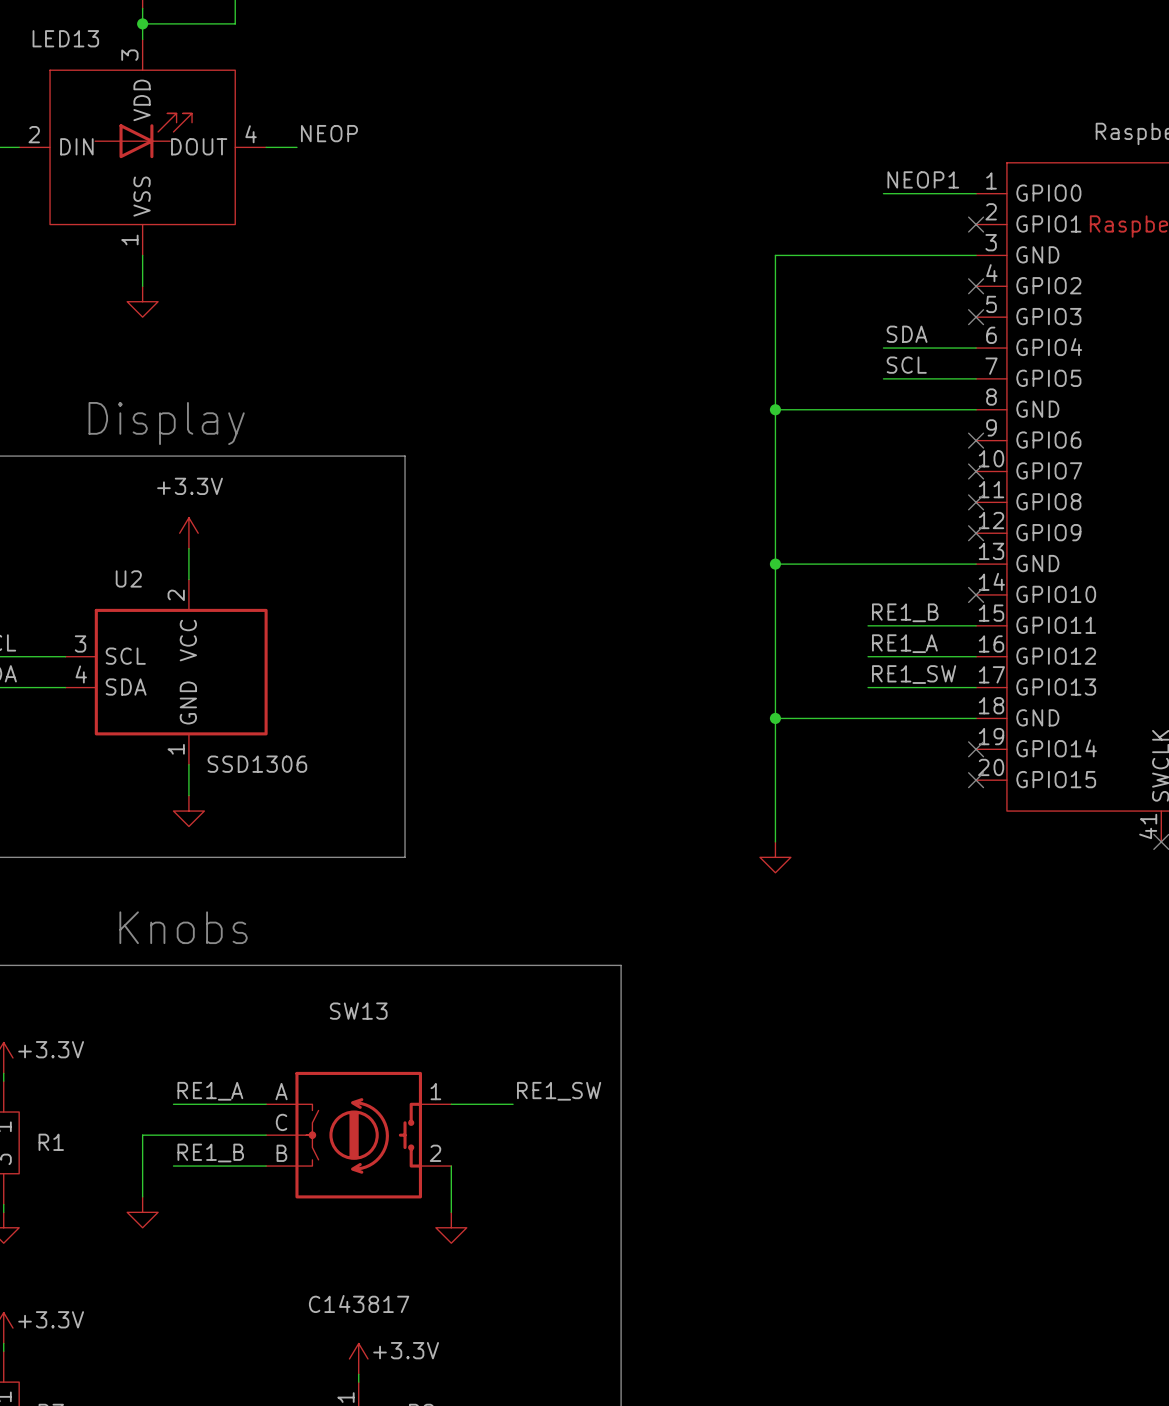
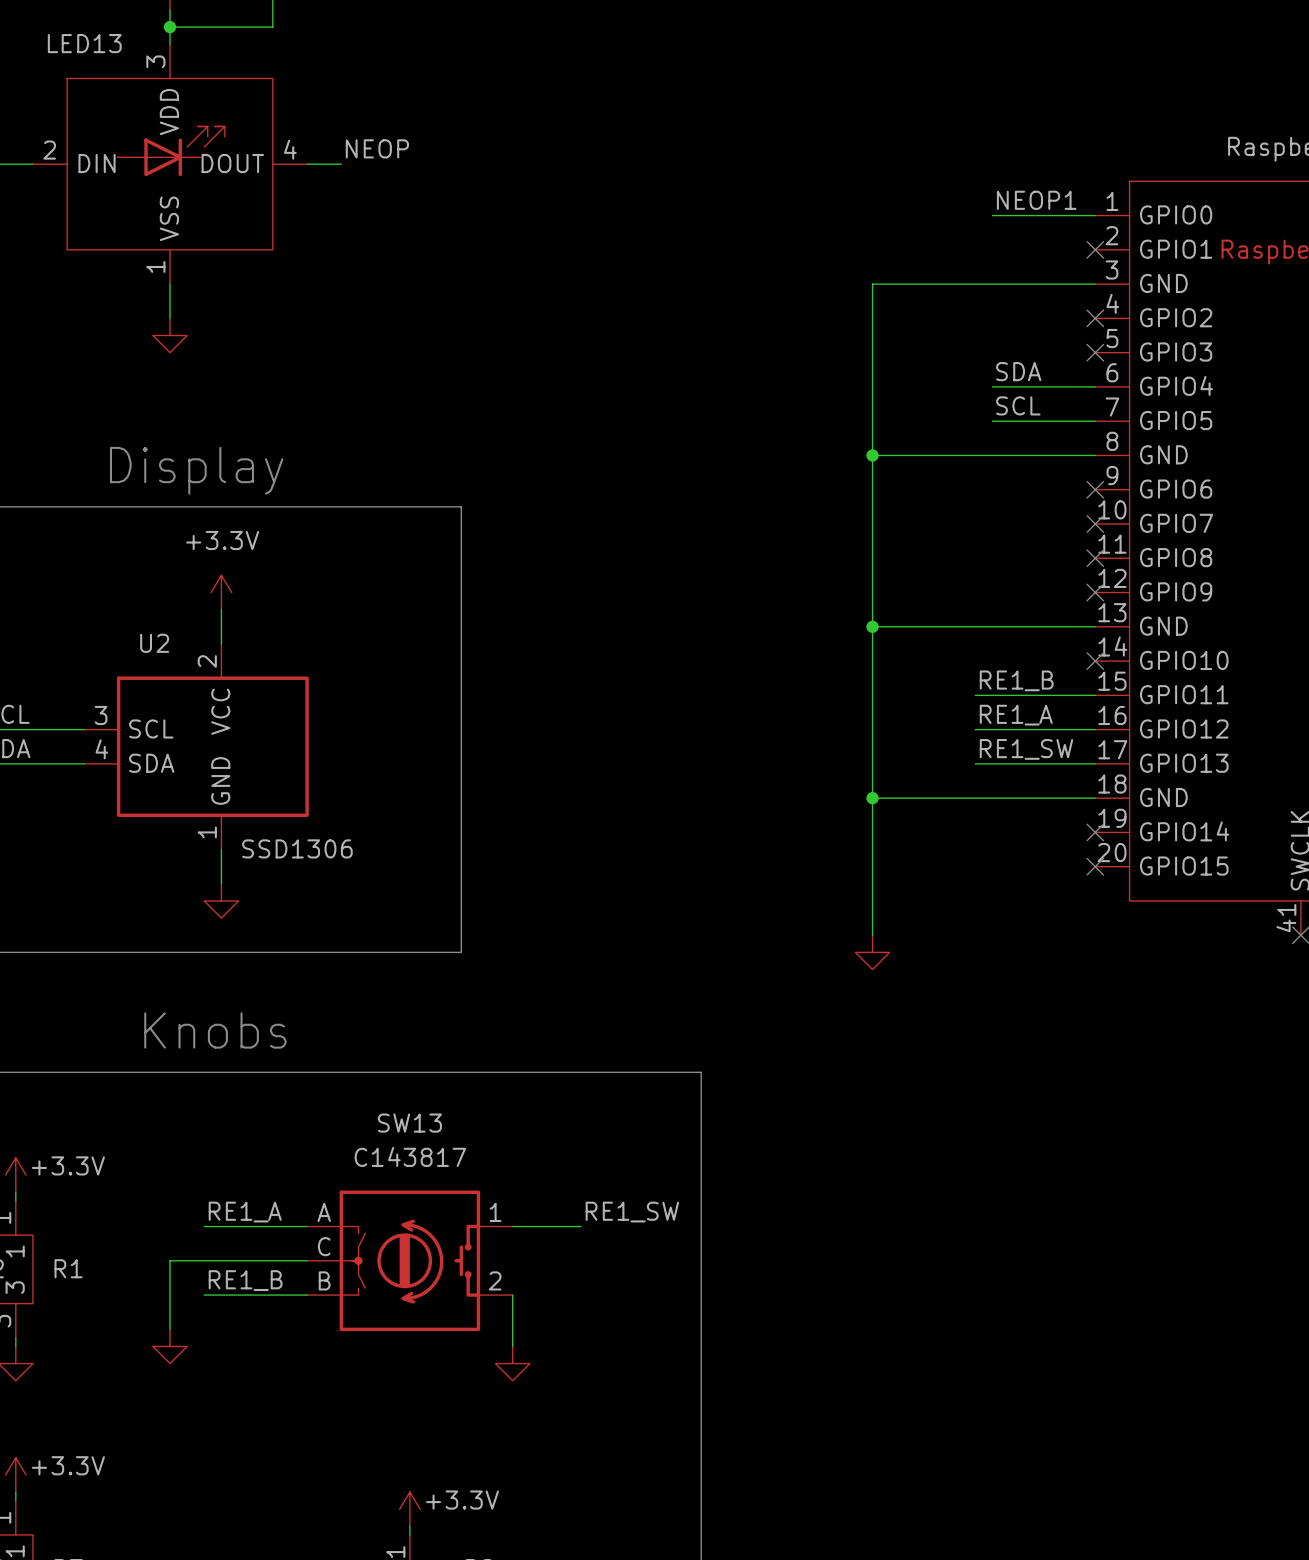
SW13 text position: C143817 (359, 1303) -> C143817 (410, 1156)

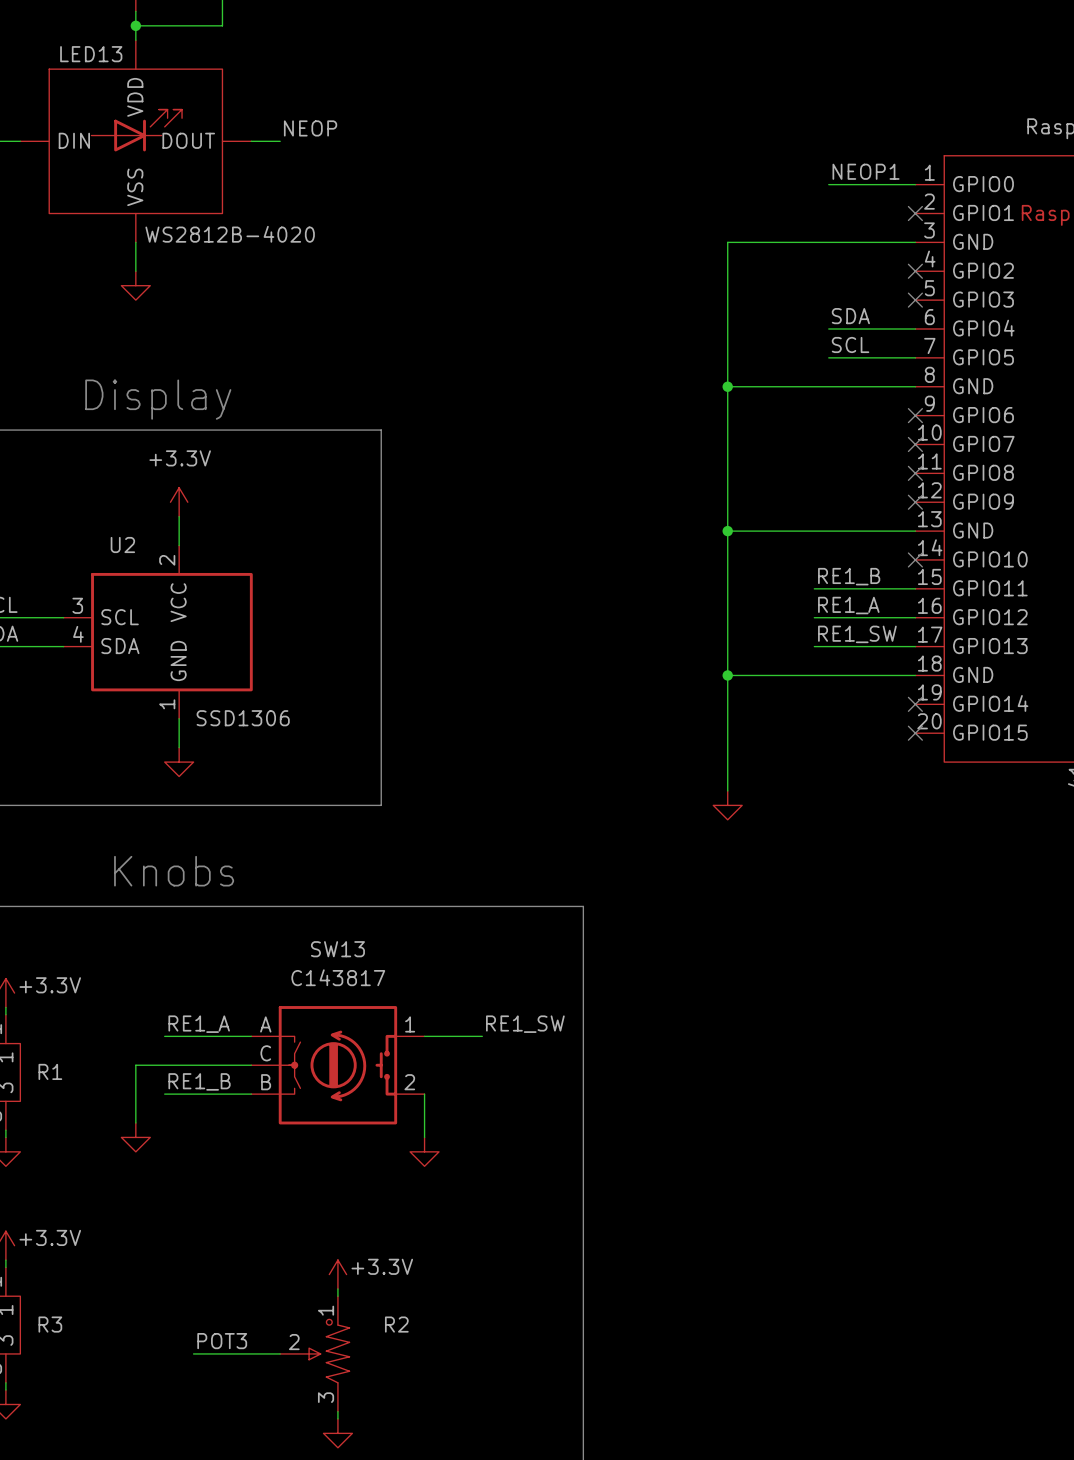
LED13 name position: LED13 (84, 43) -> LED13 (91, 54)
LED13 pin number: 3 (155, 61) -> none
LED13 pin number: 4 (290, 149) -> none
LED13 pin number: 2 (49, 150) -> none
LED13 pin number: 1 (155, 266) -> none
LED13 value: none -> WS2812B-4020 (230, 234)

